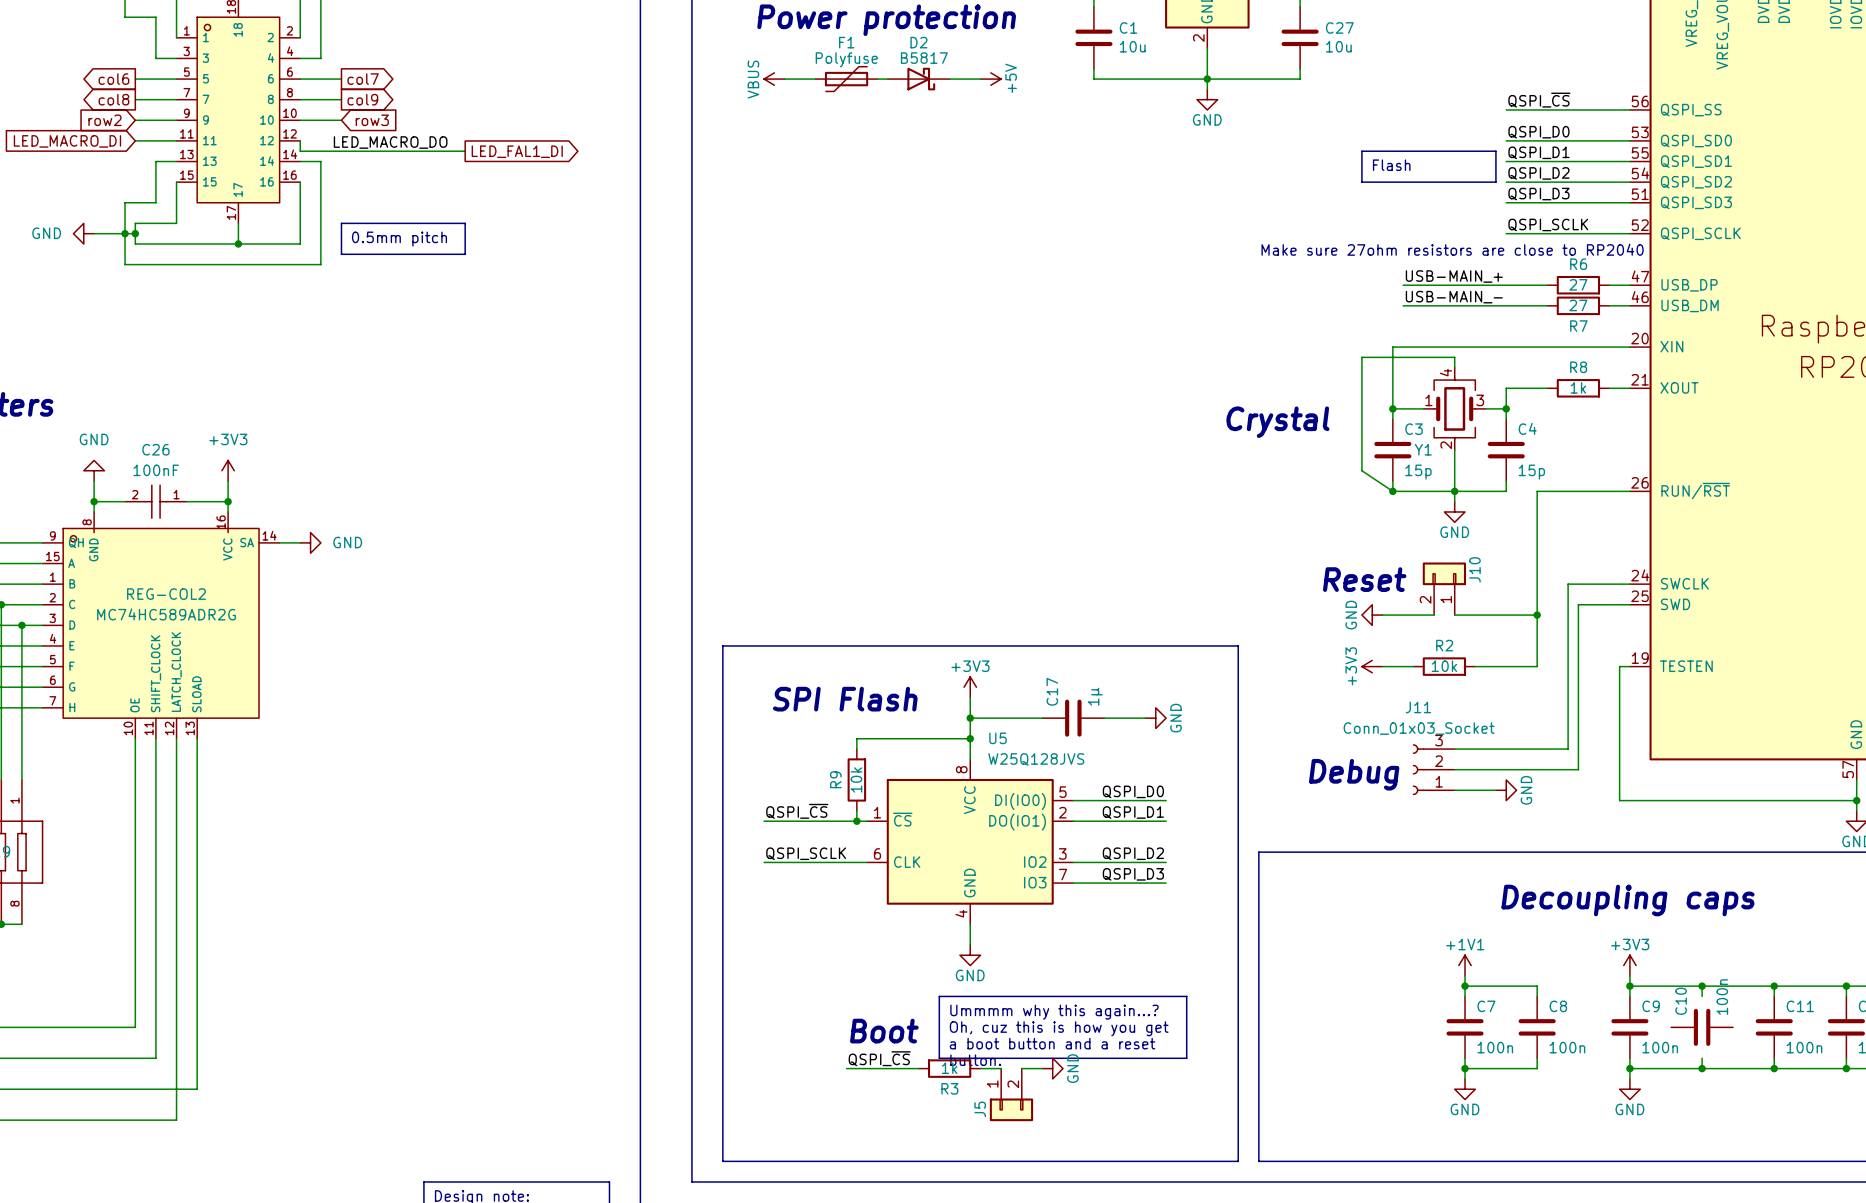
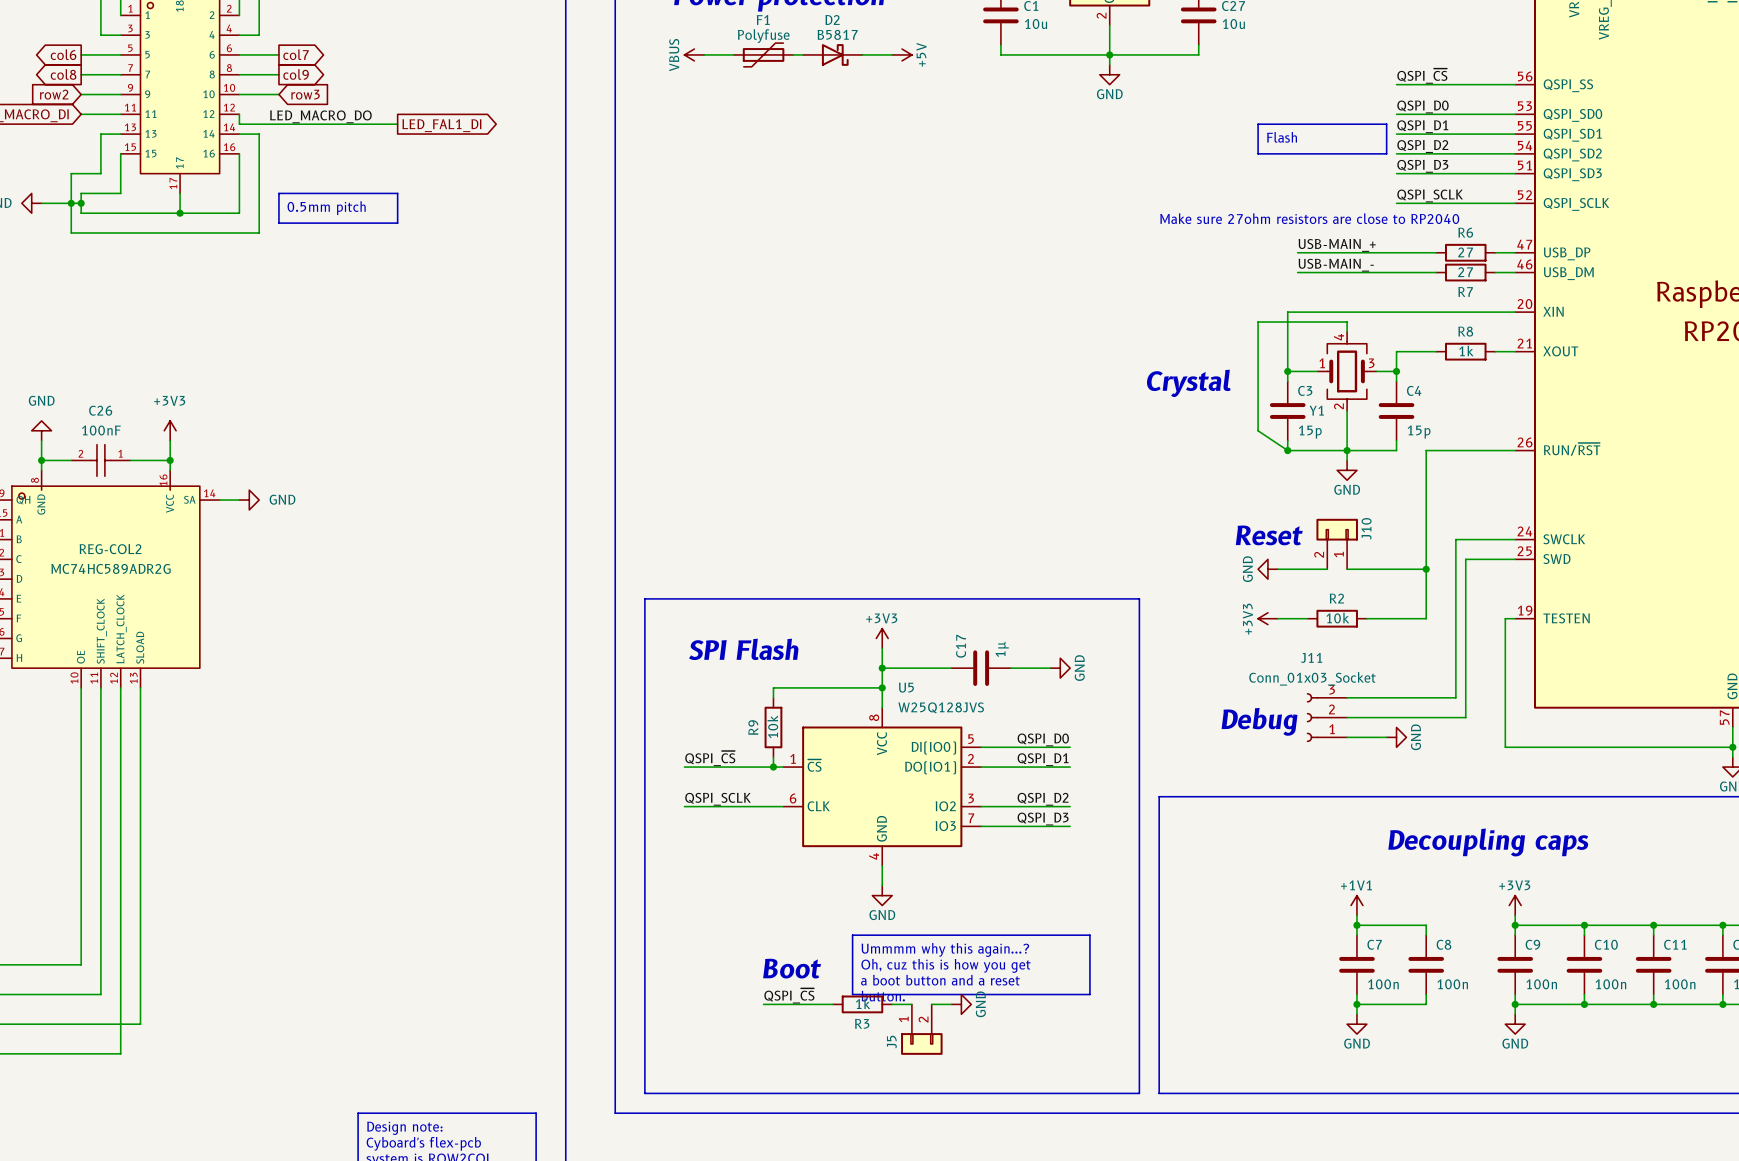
C10 rotation: 0° (1702, 1027) -> 90° clockwise (1584, 964)

